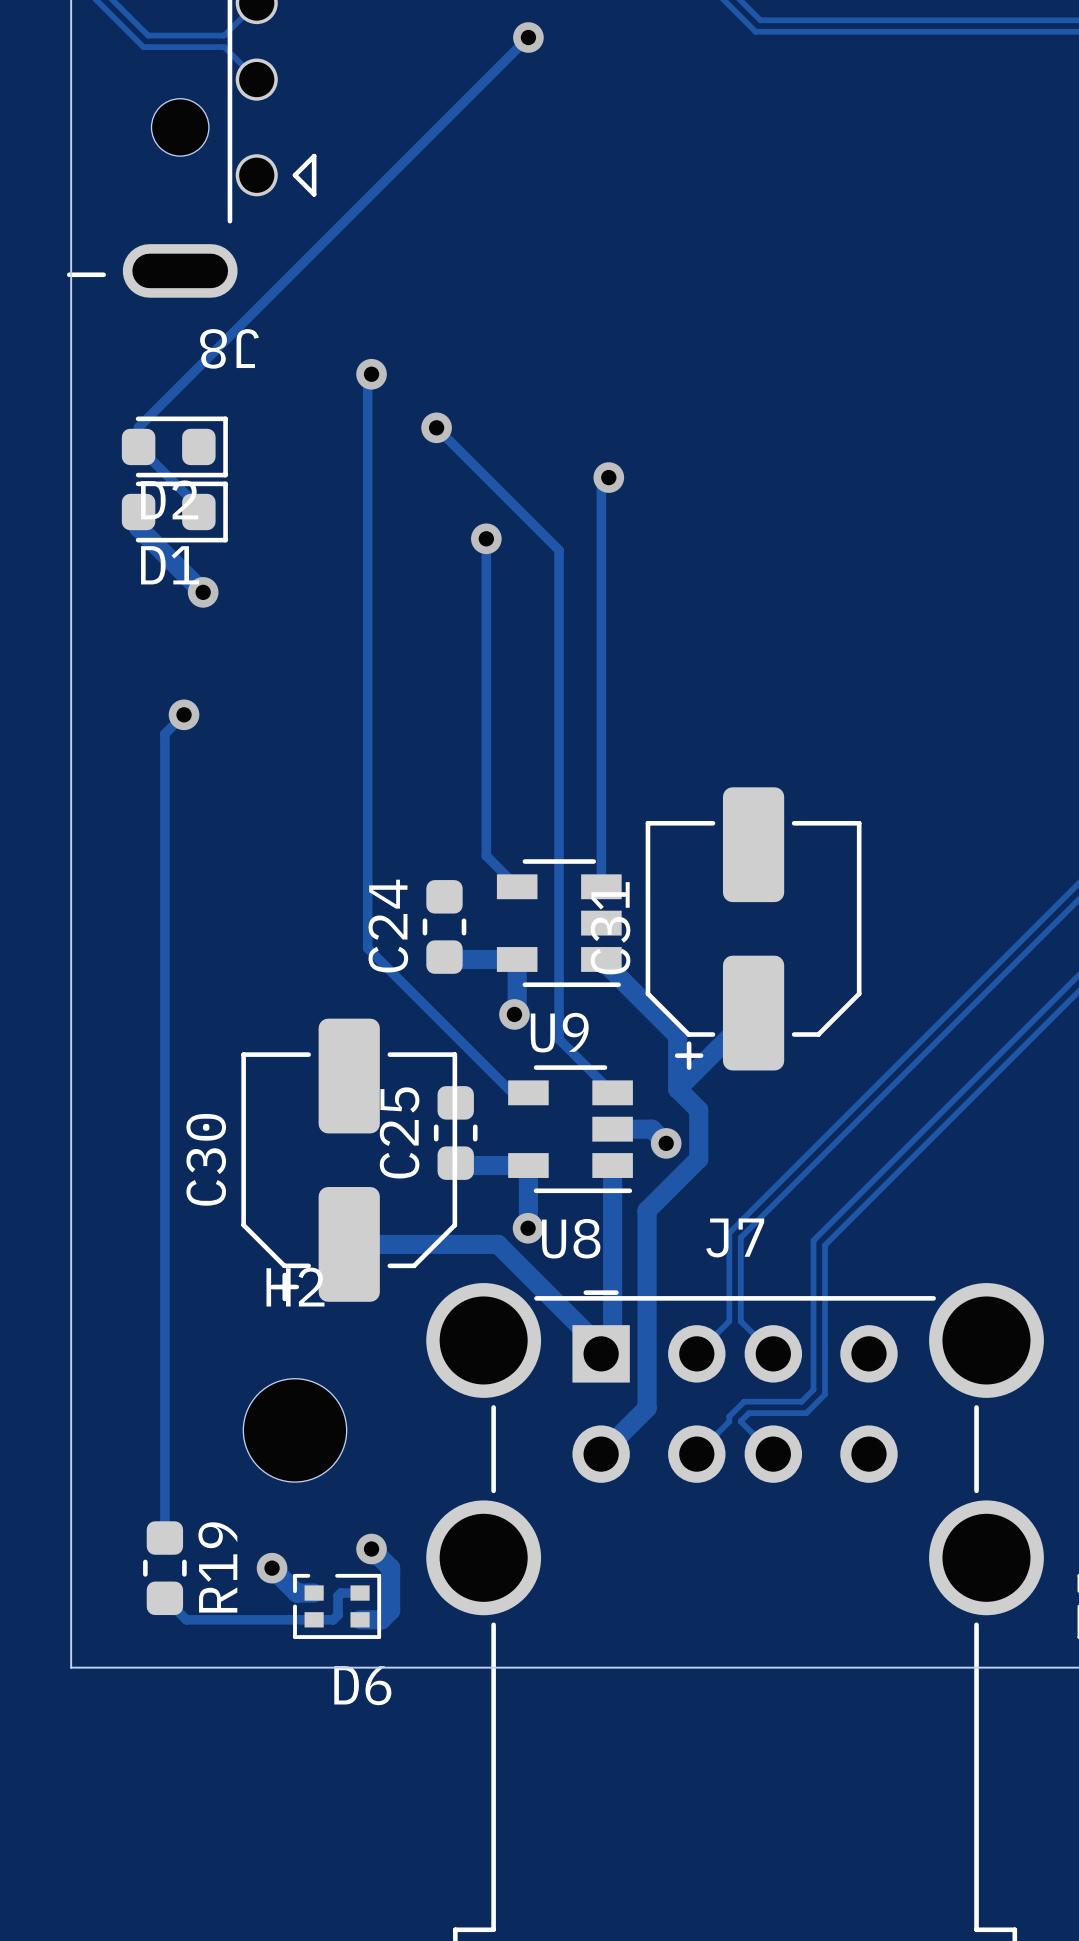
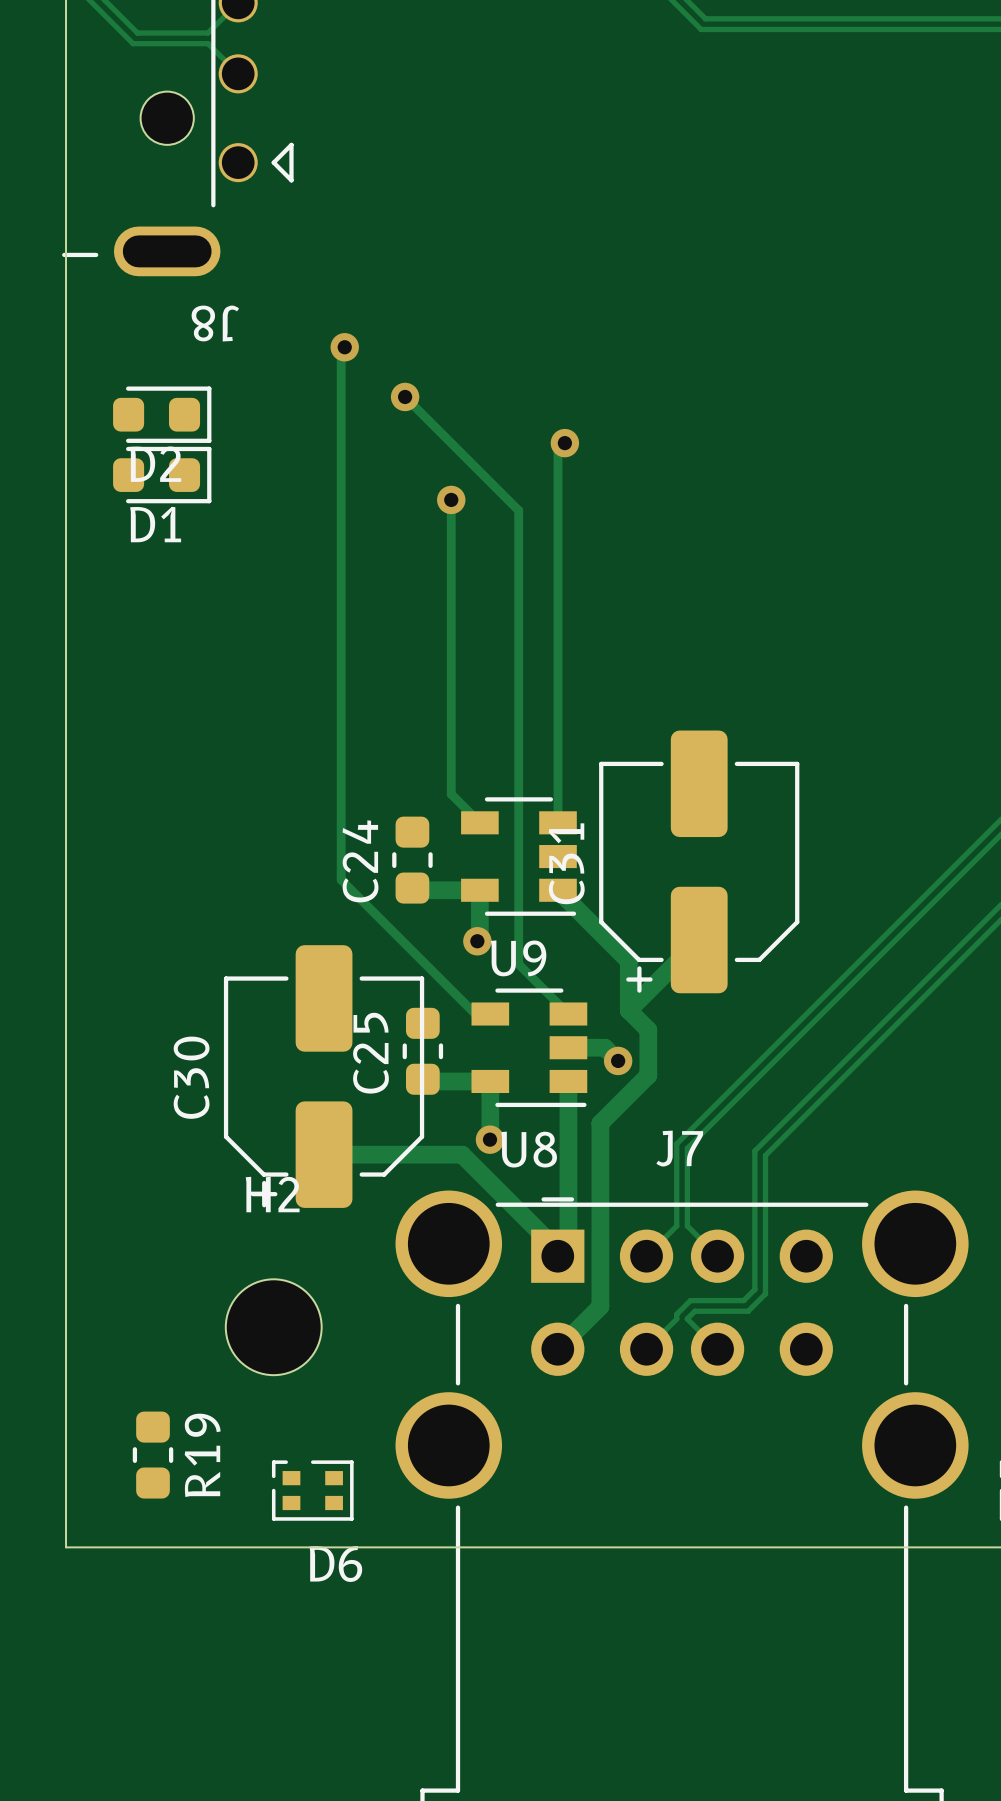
track: (528, 37) (138, 427) (138, 446) (198, 507) (198, 512) -> none
via: (528, 37) -> none
track: (138, 512) (138, 527) (203, 592) -> none
via: (203, 592) -> none
track: (184, 714) (164, 733) (164, 1538) -> none
via: (184, 714) -> none
track: (371, 1549) (390, 1568) (390, 1610) (381, 1619) (360, 1619) -> none
via: (371, 1549) -> none
track: (272, 1568) (296, 1593) (314, 1593) -> none
via: (272, 1568) -> none
track: (360, 1593) (340, 1593) (338, 1595) (338, 1615) (333, 1619) (186, 1619) (164, 1598) -> none

